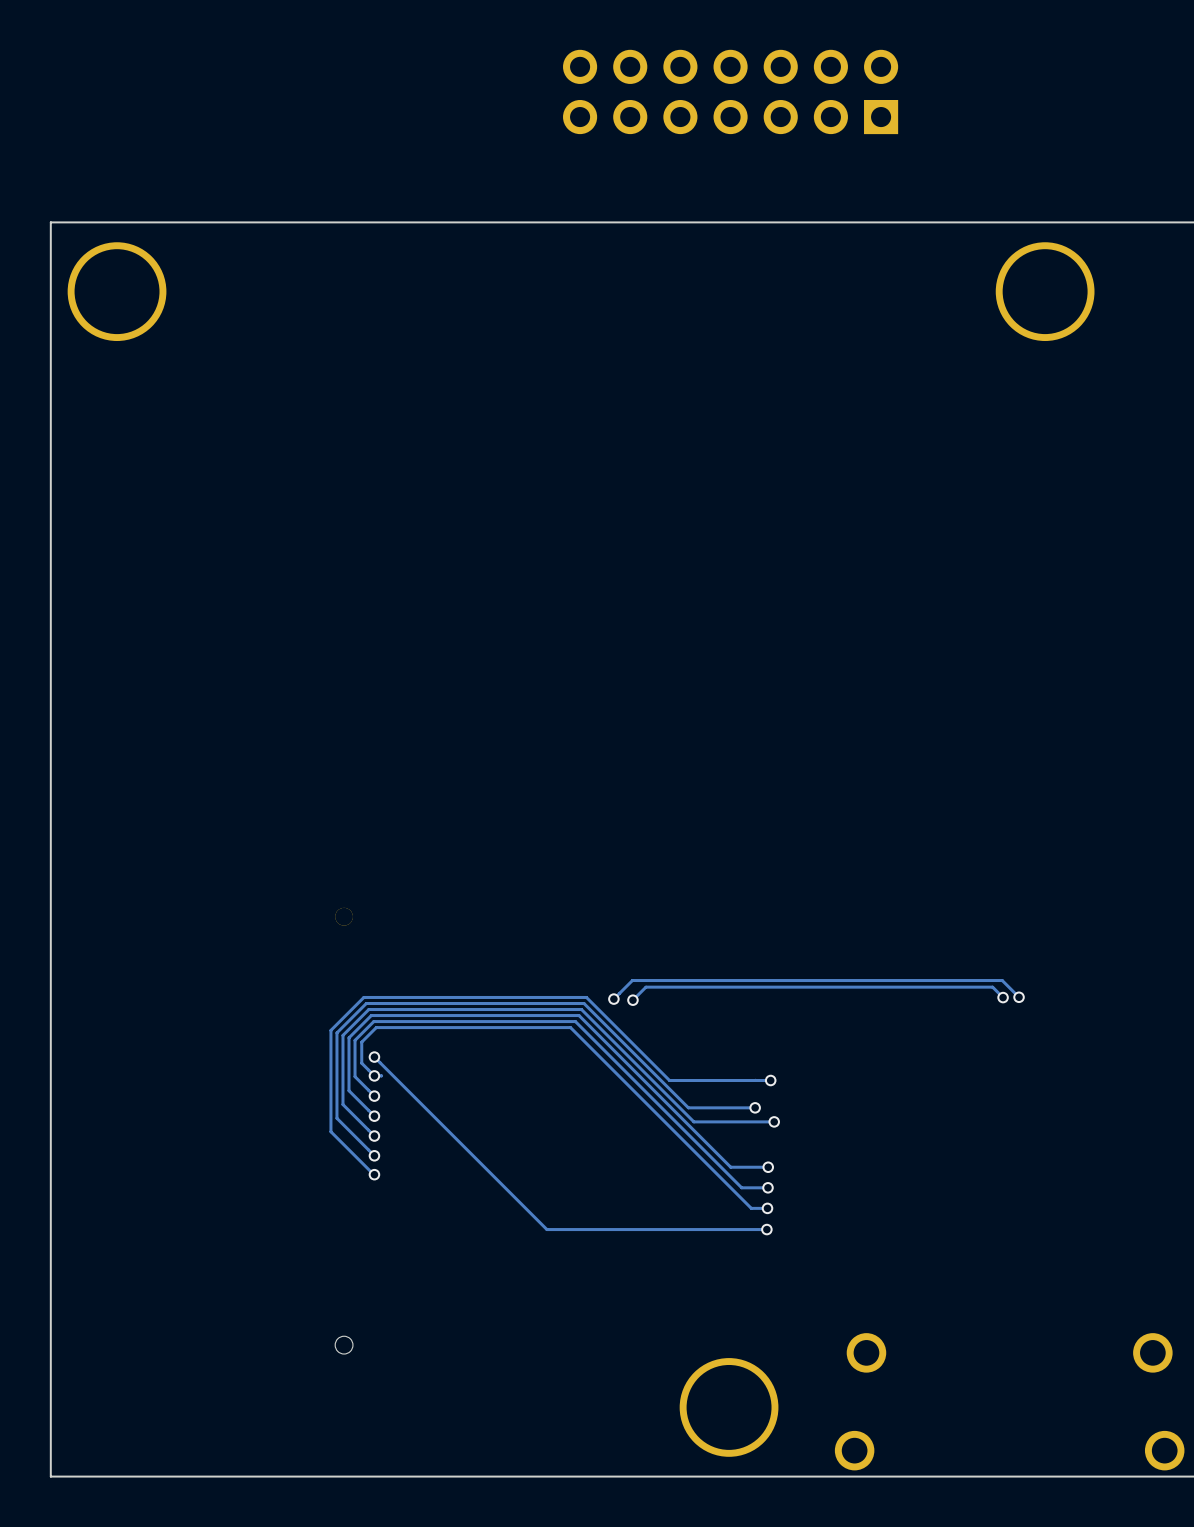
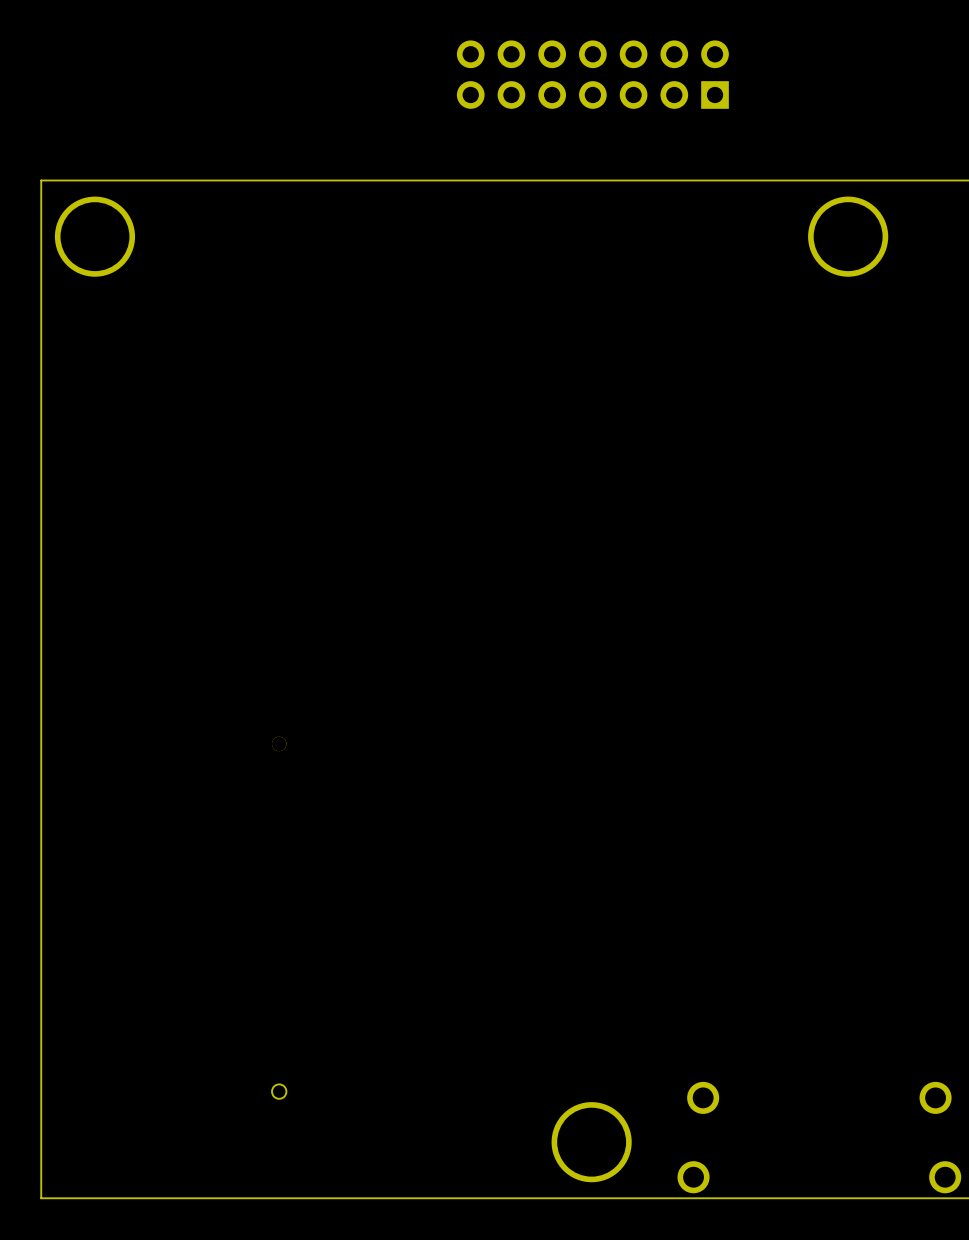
track: (1003, 997) (992, 987) (645, 987) (632, 1000) -> none
via: (1003, 997) -> none
track: (1019, 997) (1002, 980) (632, 980) (613, 999) -> none
via: (1019, 997) -> none
via: (613, 999) -> none
via: (632, 1000) -> none
track: (374, 1057) (546, 1229) (766, 1229) -> none
via: (374, 1057) -> none
via: (374, 1075) -> none
track: (381, 1075) (374, 1075) (361, 1063) (361, 1042) (376, 1027) (570, 1027) (751, 1208) (767, 1208) -> none
track: (770, 1080) (669, 1080) (586, 997) (363, 997) (330, 1030) (330, 1131) (374, 1174) -> none
via: (770, 1080) -> none
track: (374, 1096) (355, 1076) (355, 1040) (373, 1021) (575, 1021) (741, 1187) (768, 1187) -> none
via: (374, 1096) -> none
track: (755, 1107) (688, 1107) (584, 1003) (366, 1003) (336, 1032) (336, 1118) (374, 1155) -> none
via: (755, 1107) -> none
track: (374, 1116) (349, 1090) (349, 1037) (371, 1015) (579, 1015) (730, 1167) (768, 1167) -> none
via: (374, 1116) -> none
track: (774, 1121) (693, 1121) (581, 1009) (368, 1009) (342, 1035) (342, 1104) (374, 1136) -> none
via: (774, 1121) -> none
via: (374, 1136) -> none
via: (374, 1155) -> none
via: (768, 1167) -> none
via: (374, 1174) -> none
via: (768, 1187) -> none
via: (767, 1208) -> none
via: (766, 1229) -> none

